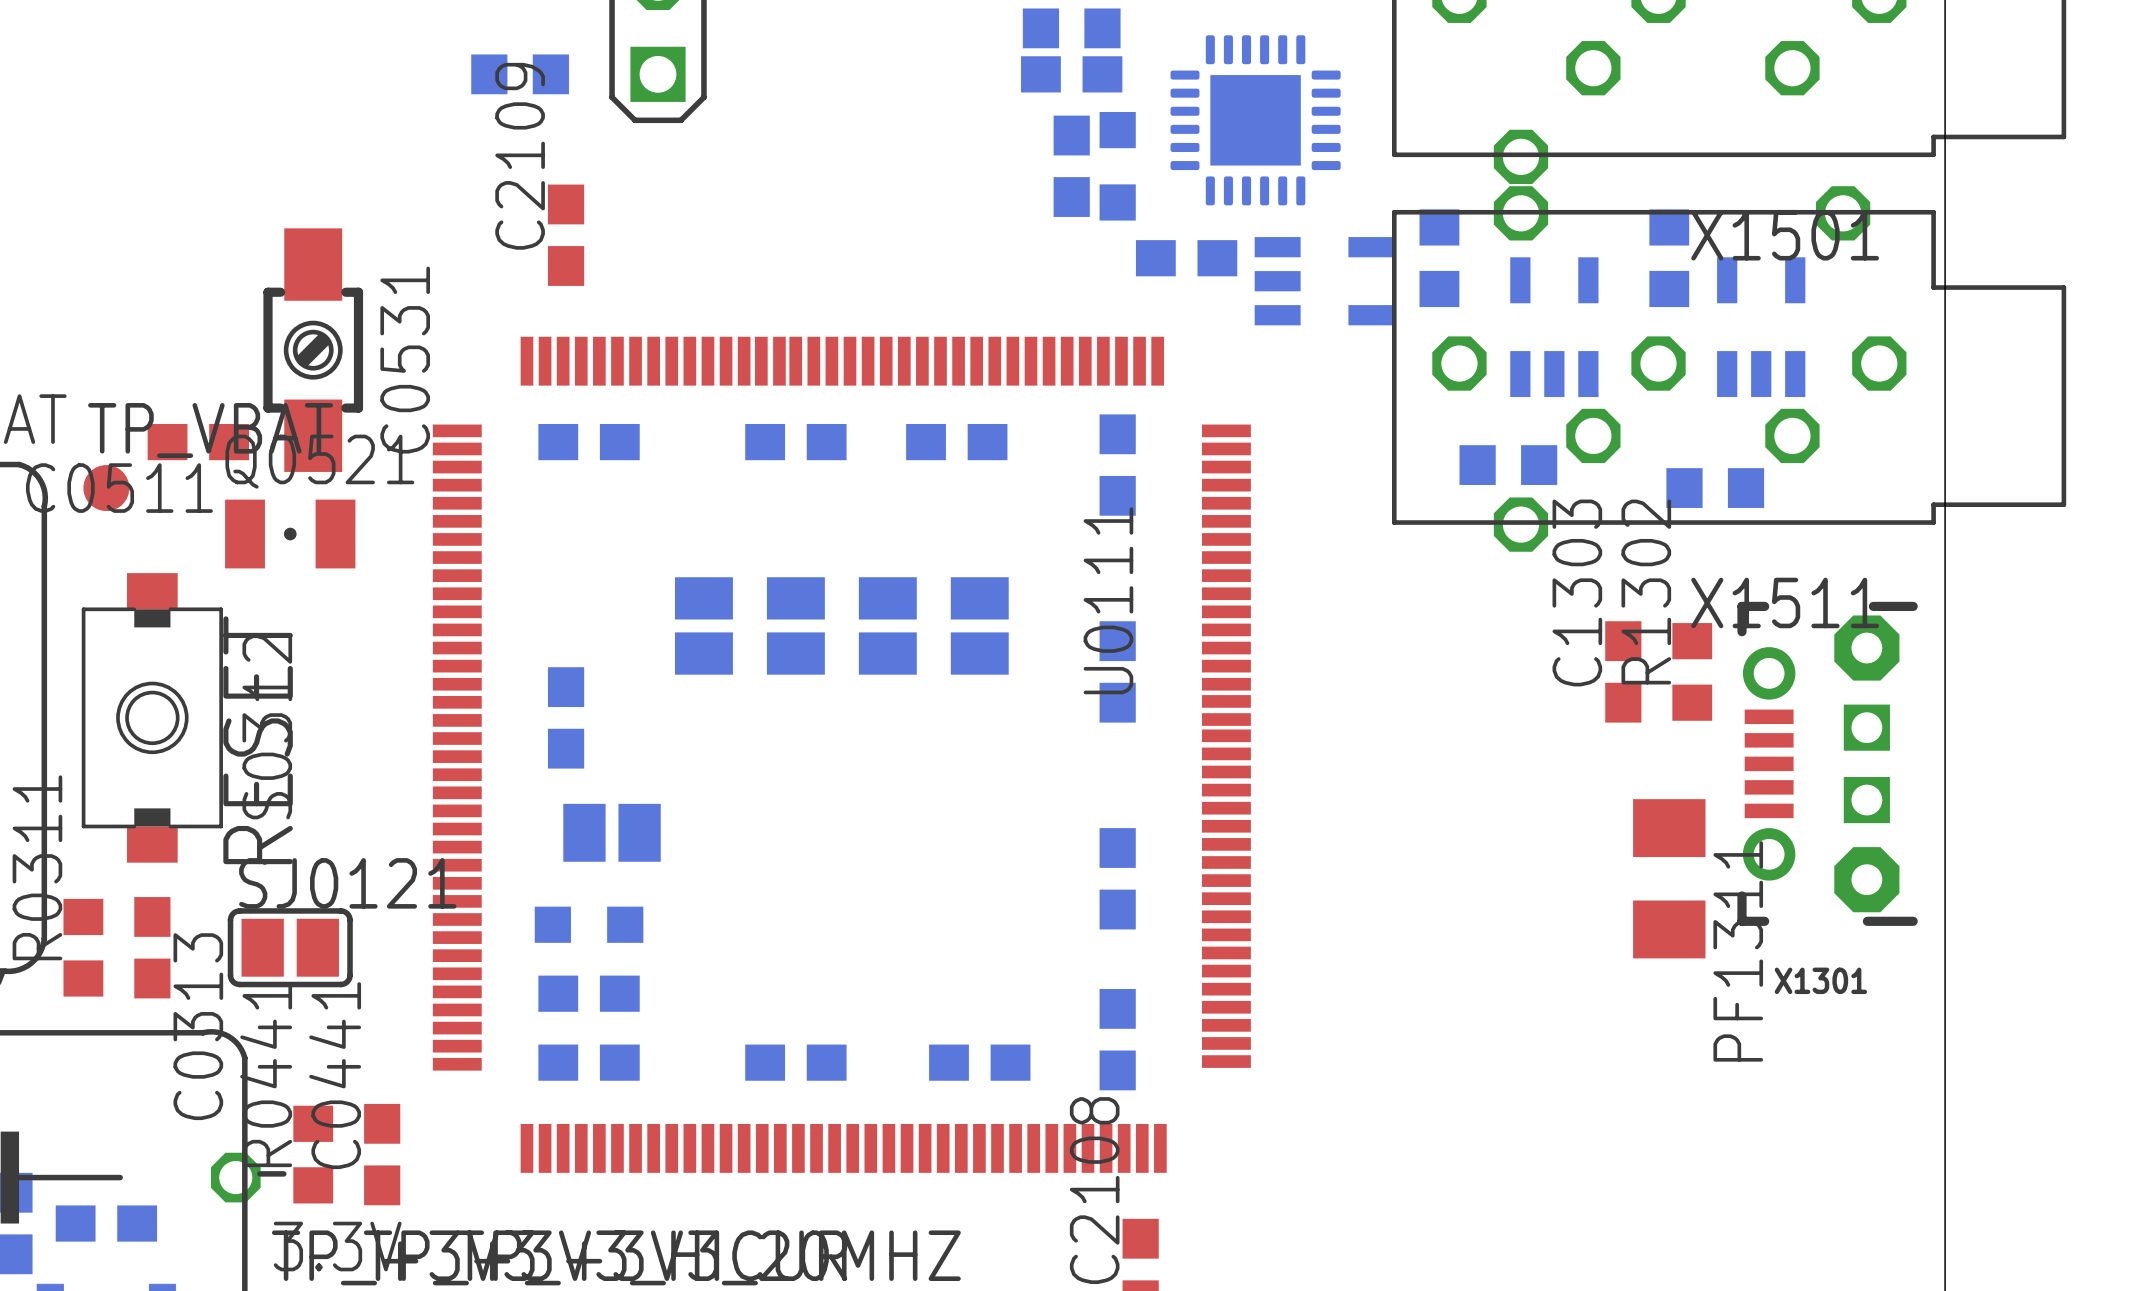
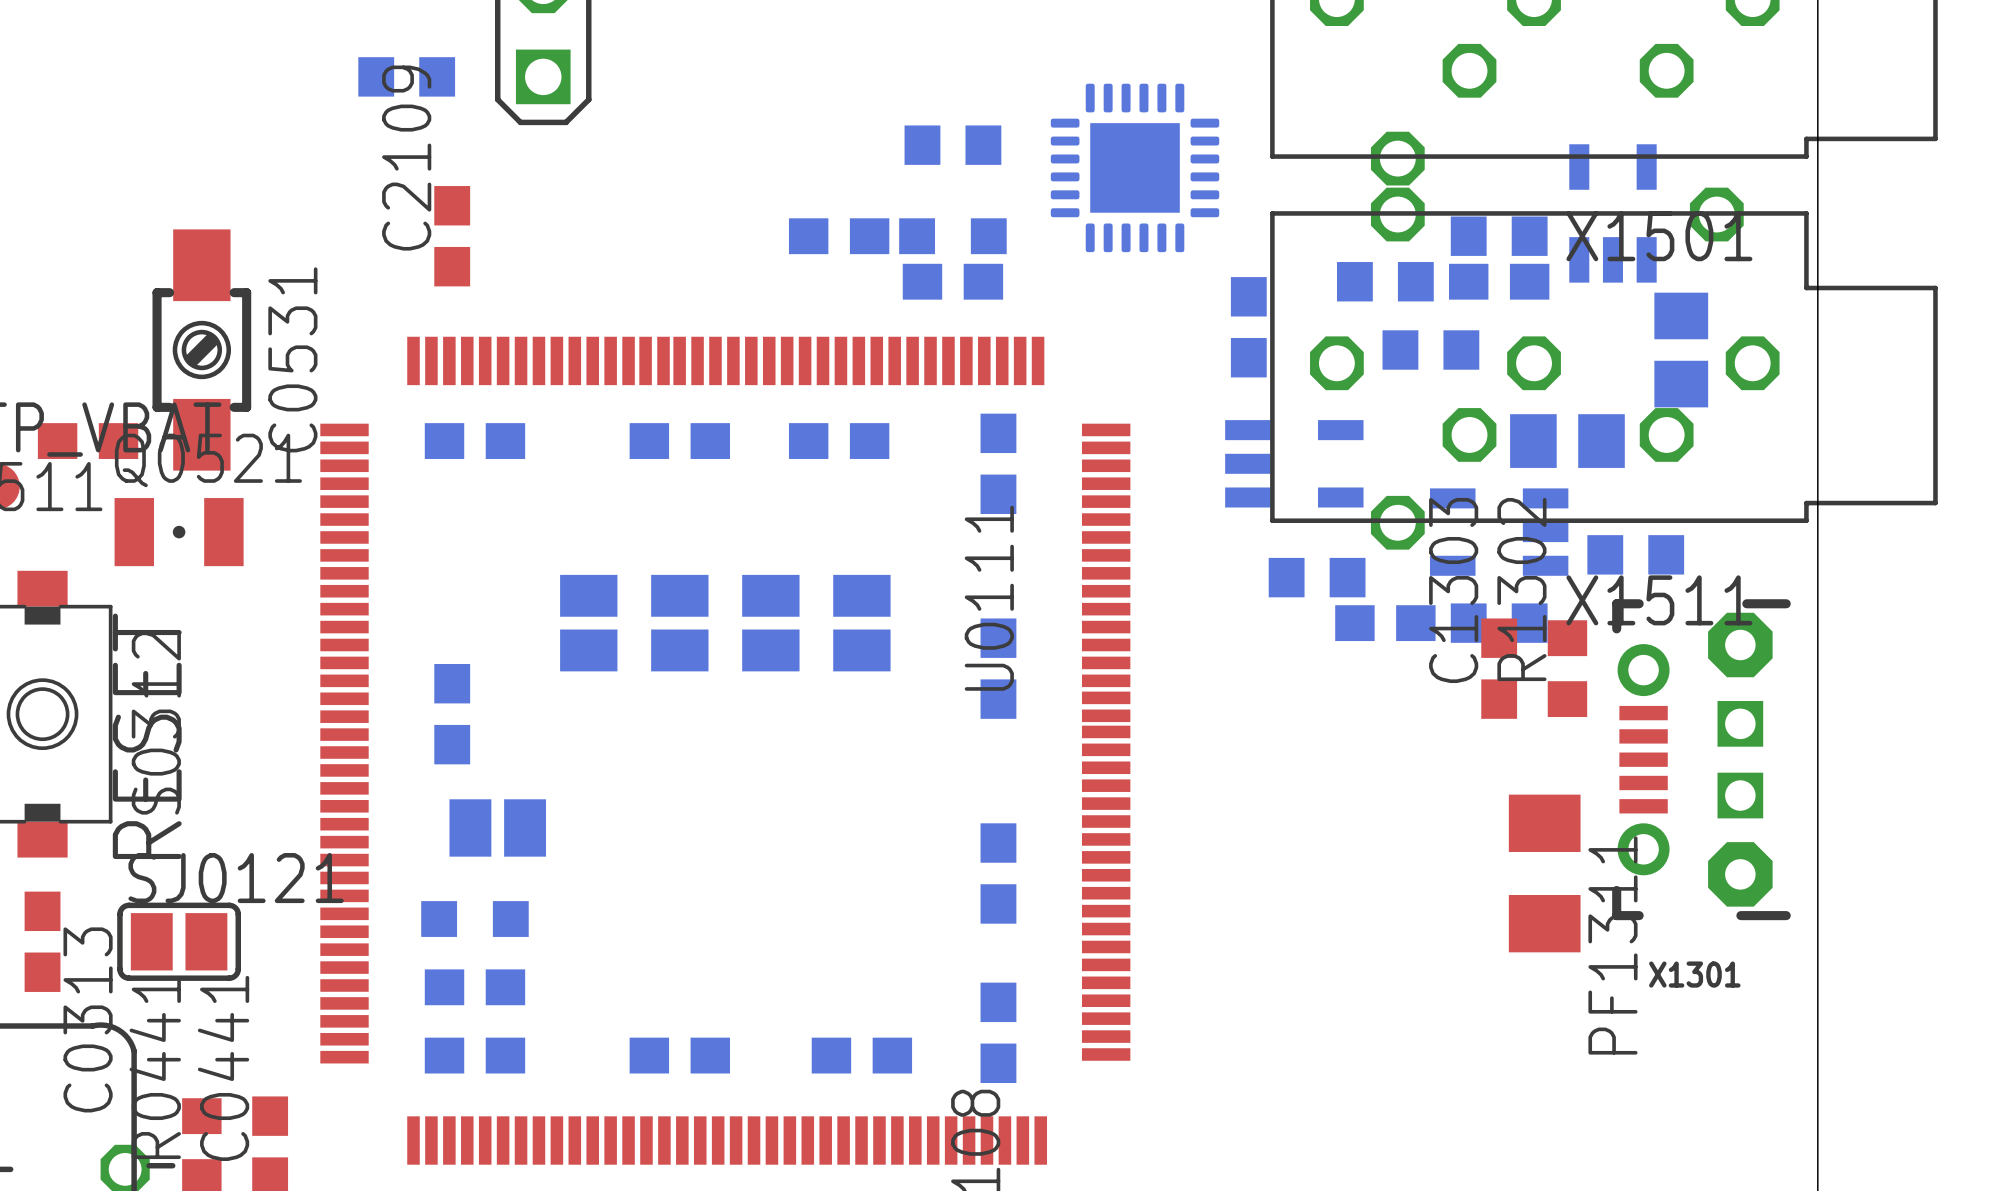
part: (1071, 28) -> none
part: (1071, 74) -> none
part footprint: [1053, 115, 1090, 217] -> [904, 125, 1002, 165]
part position: (1255, 120) -> (1135, 167)
part rotation: 0° (1117, 166) -> 90° clockwise (952, 236)
part position: (1117, 166) -> (952, 236)
part: none -> (839, 236)
part footprint: [1510, 257, 1599, 398] -> [1382, 330, 1480, 370]
part: (1186, 258) -> none
part rotation: 0° (1439, 258) -> 90° clockwise (1385, 281)
part position: (1439, 258) -> (1385, 281)
part rotation: 0° (1669, 258) -> 90° clockwise (1499, 236)
part: none -> (952, 281)
part: (1324, 281) -> none
part: none -> (1499, 281)
part: none -> (1248, 327)
part position: (1761, 327) -> (1612, 213)
part: none -> (1681, 350)
part: none -> (1567, 441)
part: none -> (1294, 463)
part: (1508, 465) -> none
part: (1715, 488) -> none
part: none -> (1499, 532)
part: none -> (1635, 554)
part: none -> (1317, 577)
part: none -> (1385, 623)
part: none -> (1499, 623)

